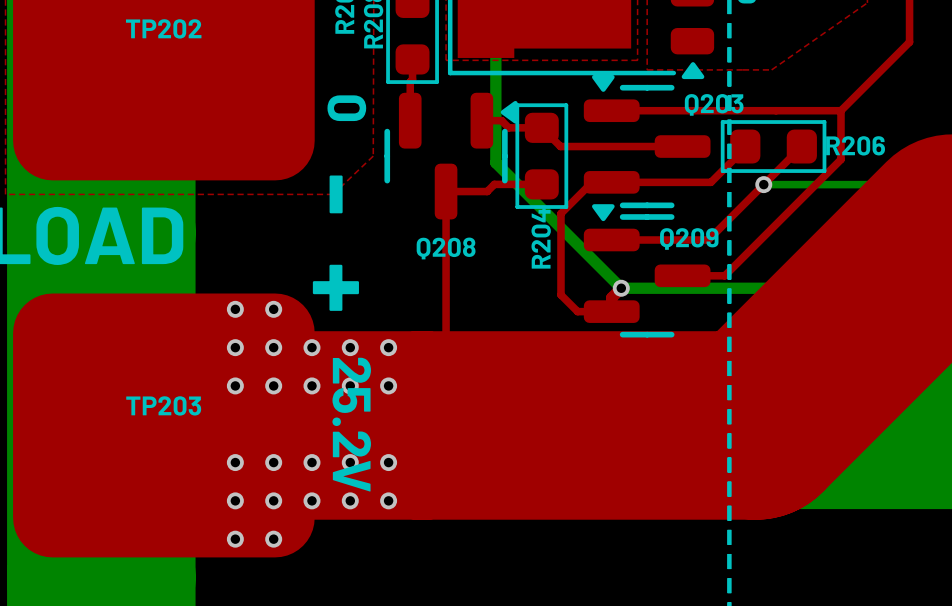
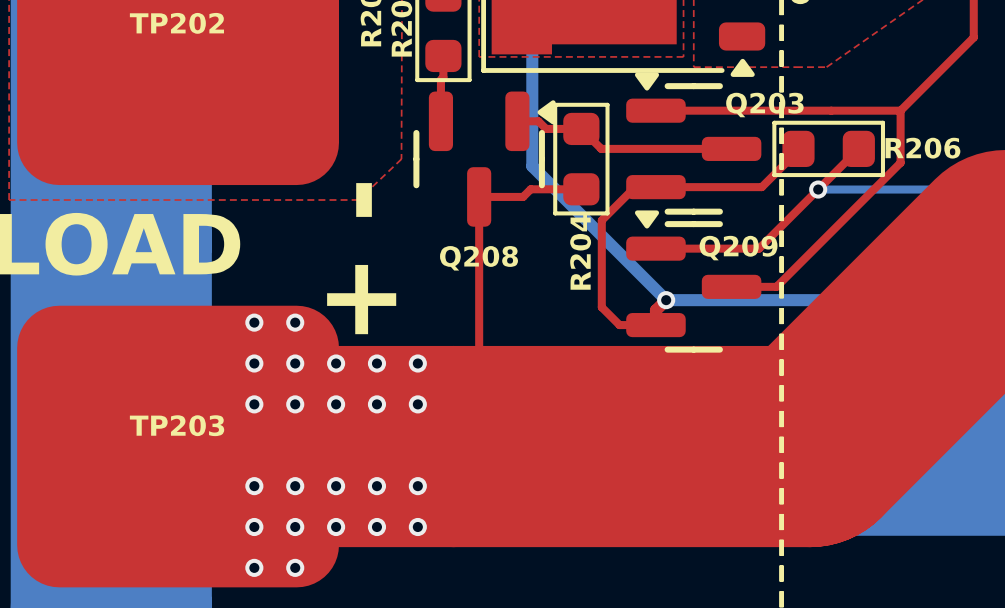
text: 0 (346, 108) -> none
text: 25.2V (351, 424) -> none

